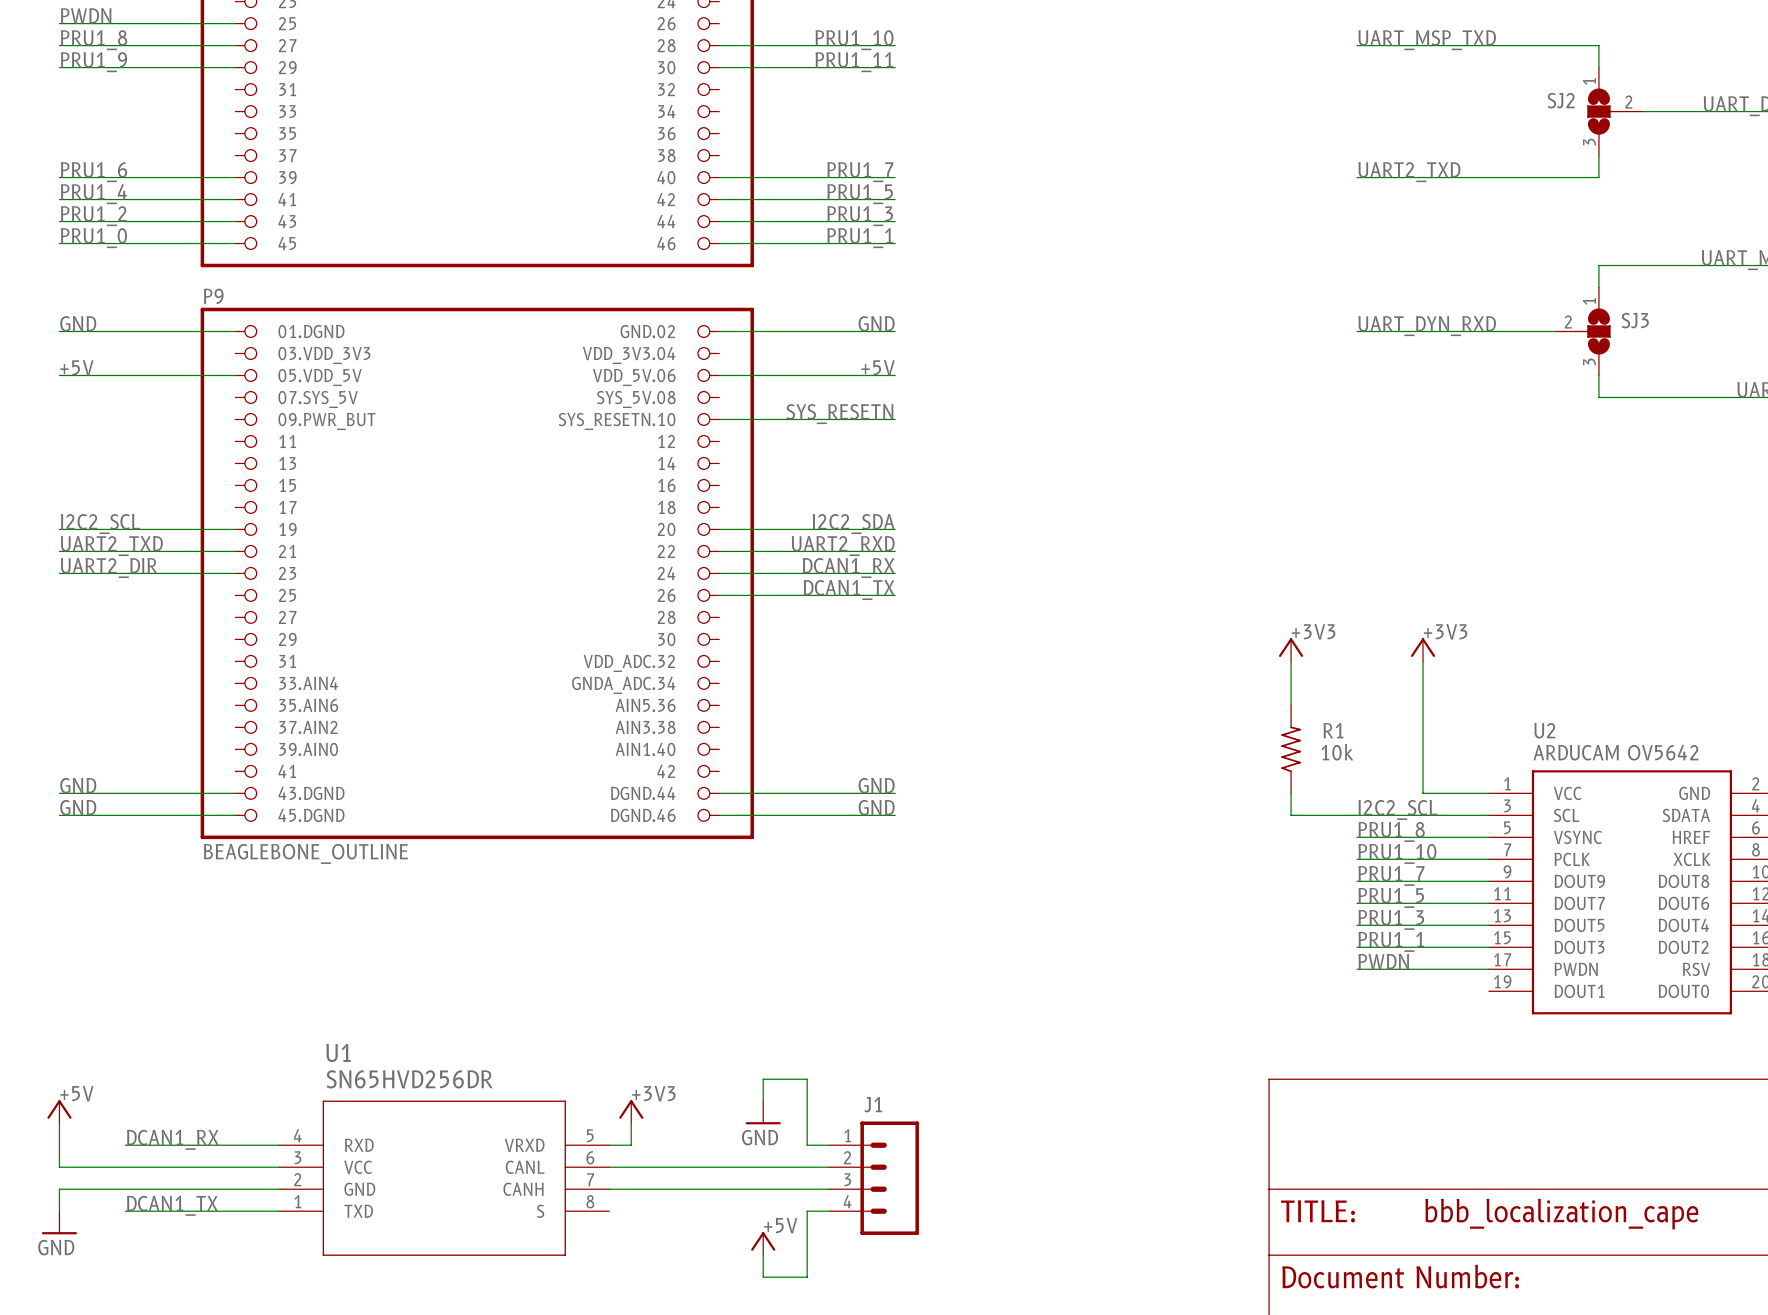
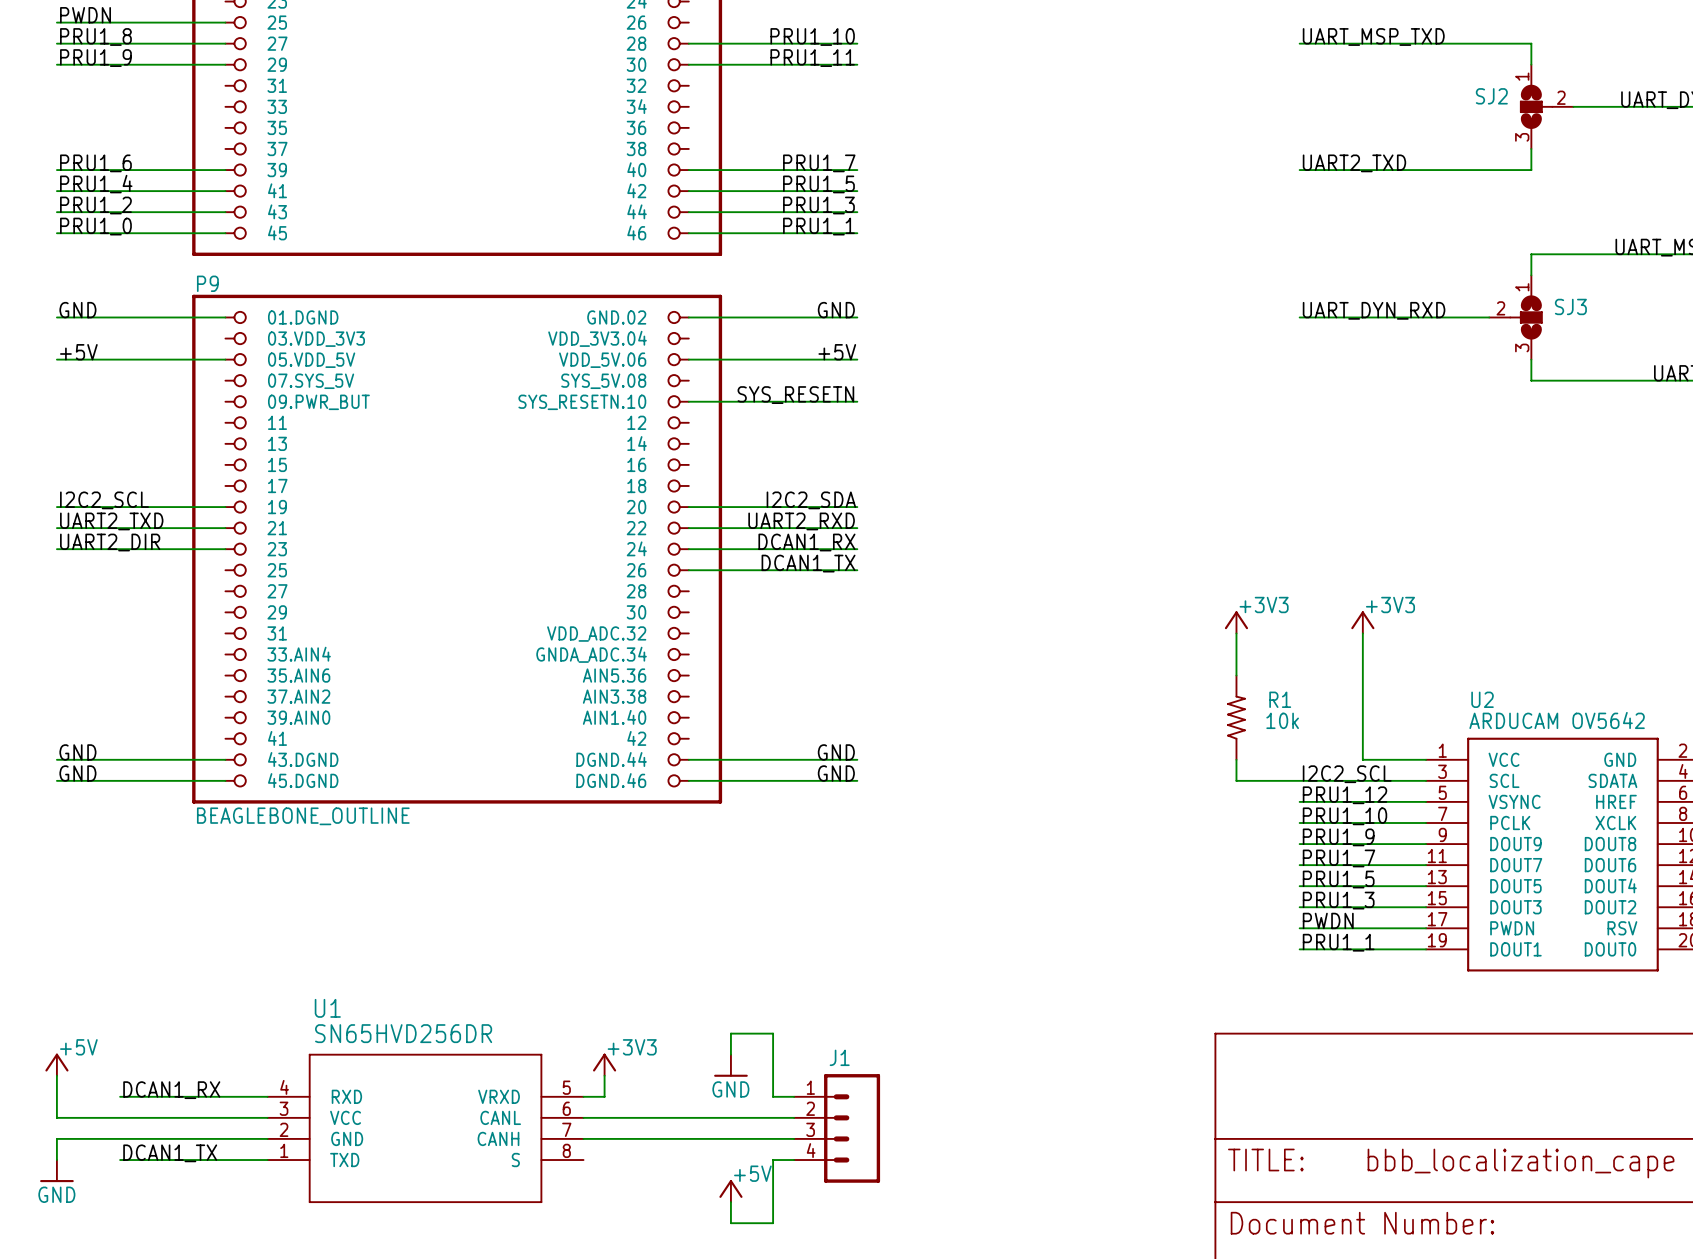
label: PRU1_8 (1391, 831) -> PRU1_12 (1344, 795)
label: PRU1_7 (1391, 875) -> PRU1_9 (1338, 837)
label: PRU1_5 (1391, 897) -> PRU1_7 (1338, 858)
label: PRU1_3 (1391, 919) -> PRU1_5 (1338, 879)
label: PRU1_1 (1391, 941) -> PRU1_3 (1338, 900)
label: none -> PRU1_1 (1338, 942)
wire: none -> (1299, 949) (1426, 949)

